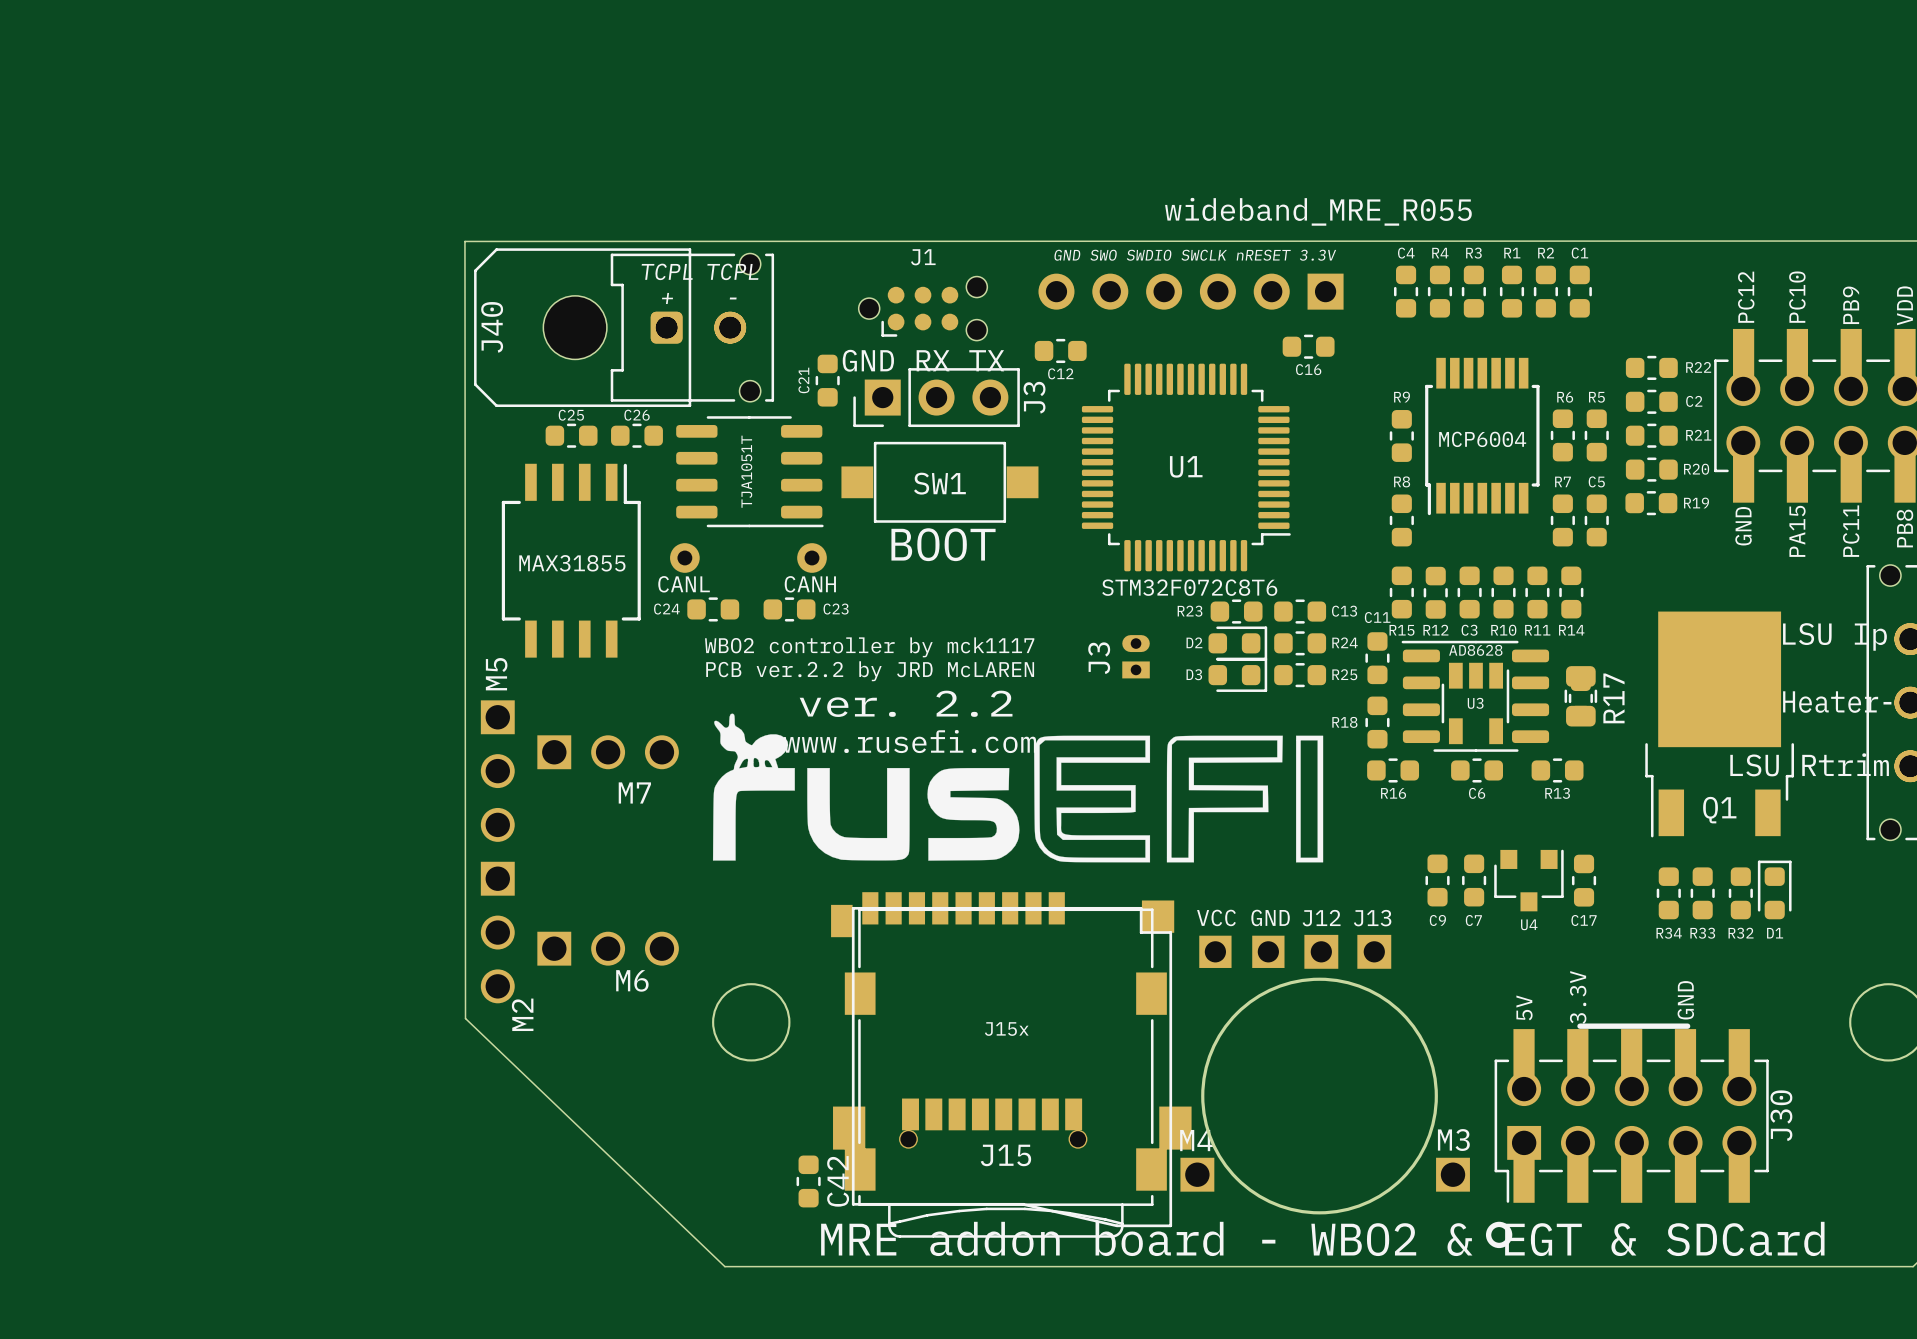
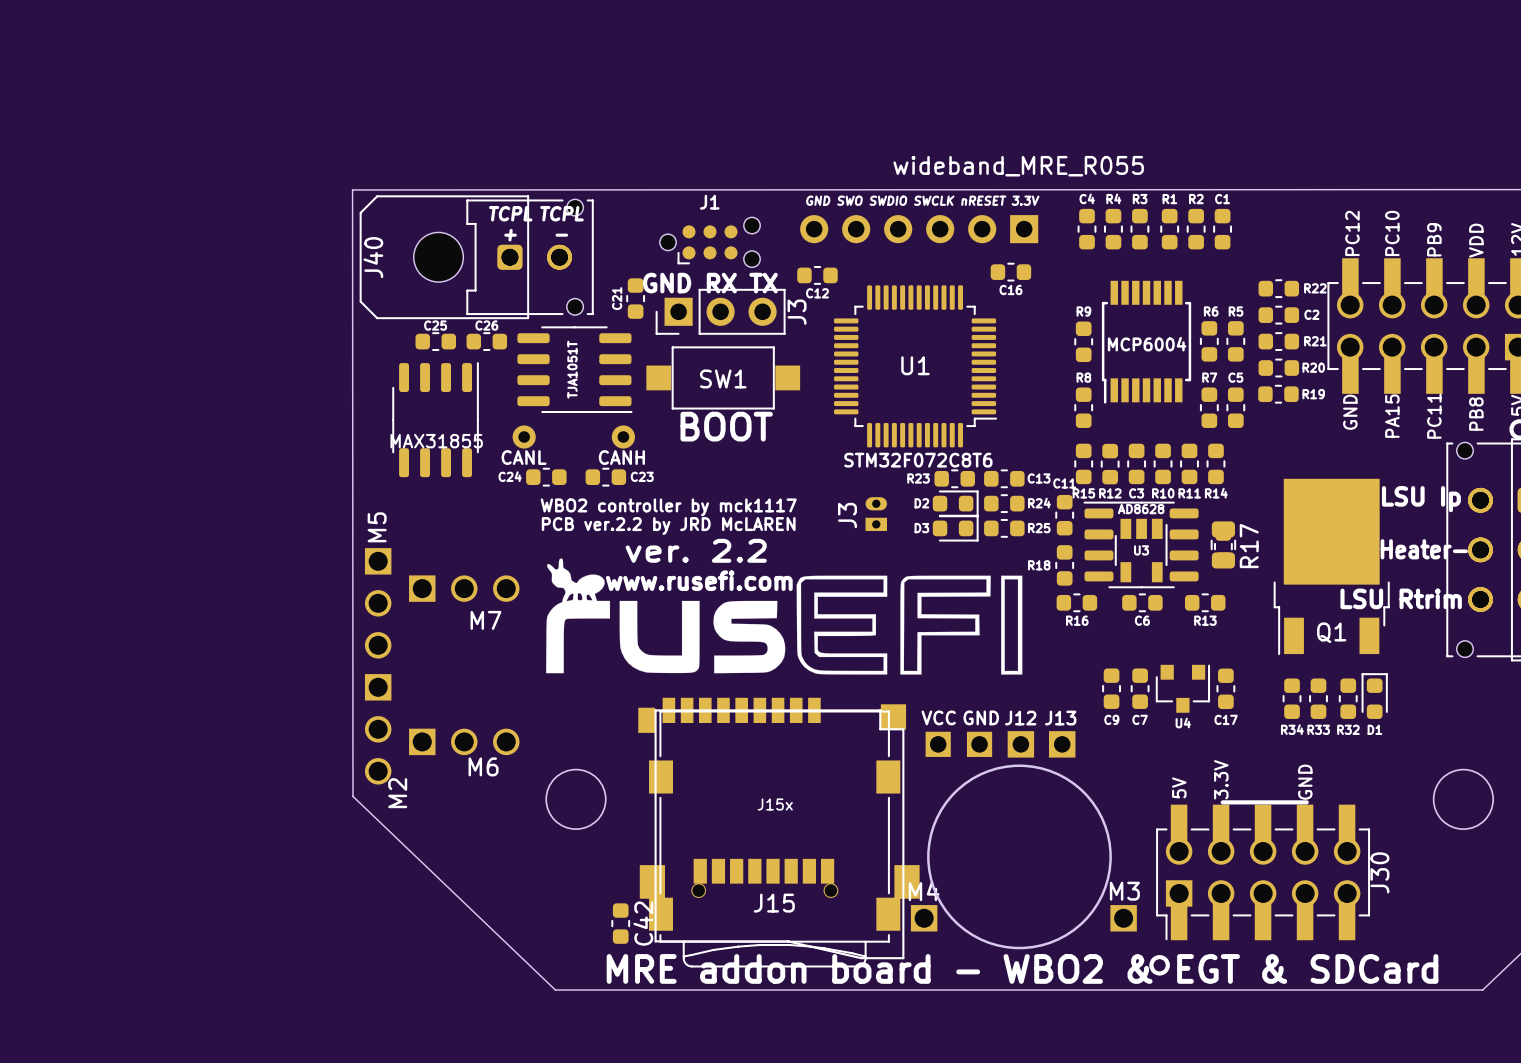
part: none -> (435, 419)
part: (571, 560) -> none

